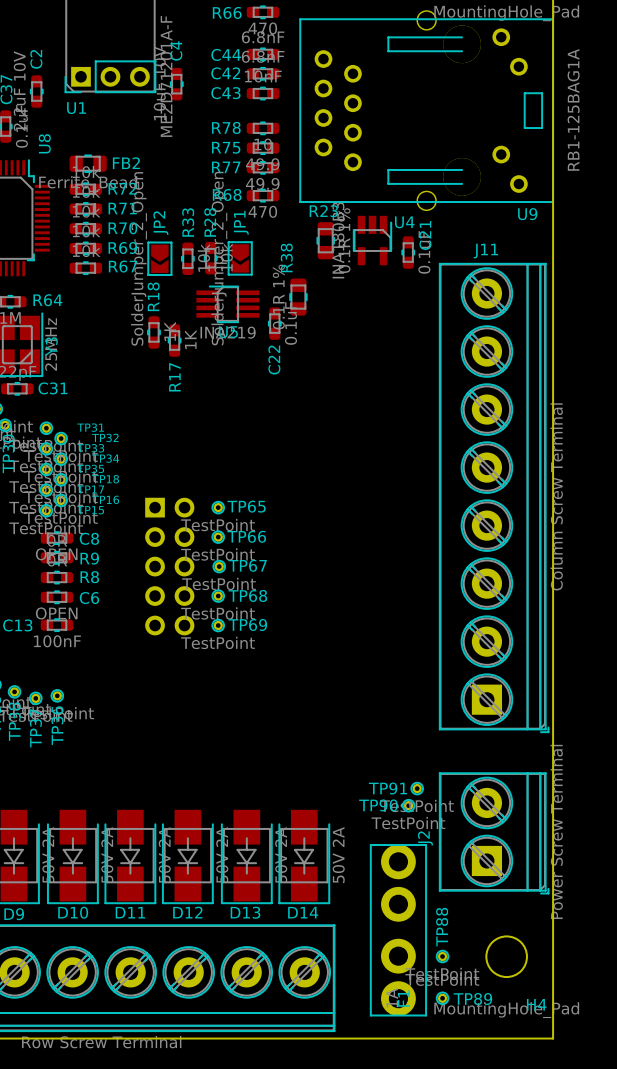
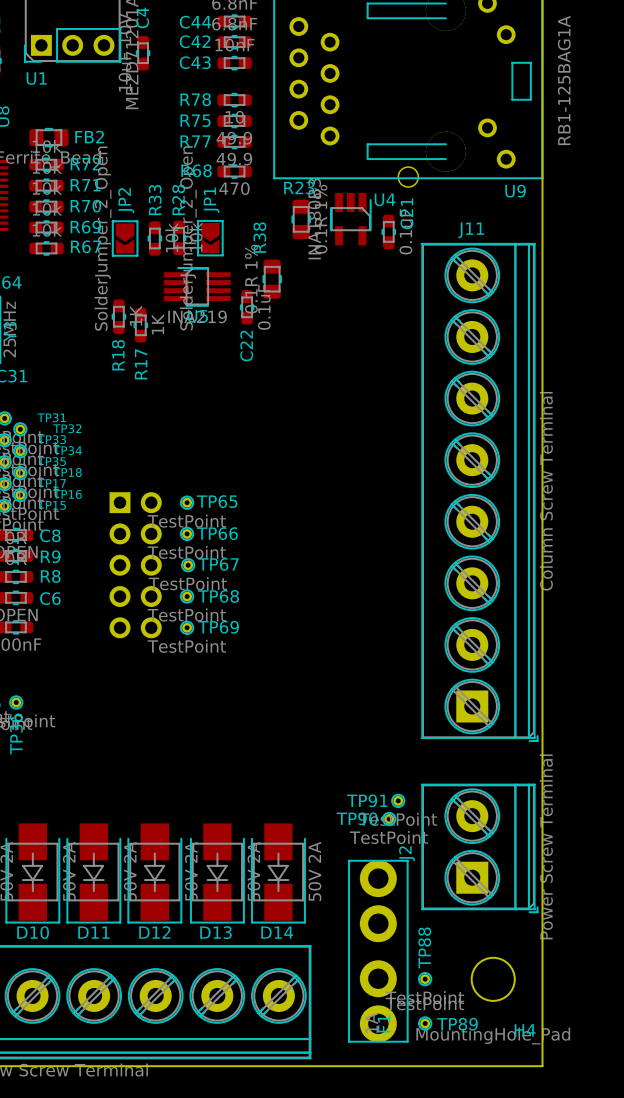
R18 name position: R18 (153, 296) -> R18 (118, 355)

